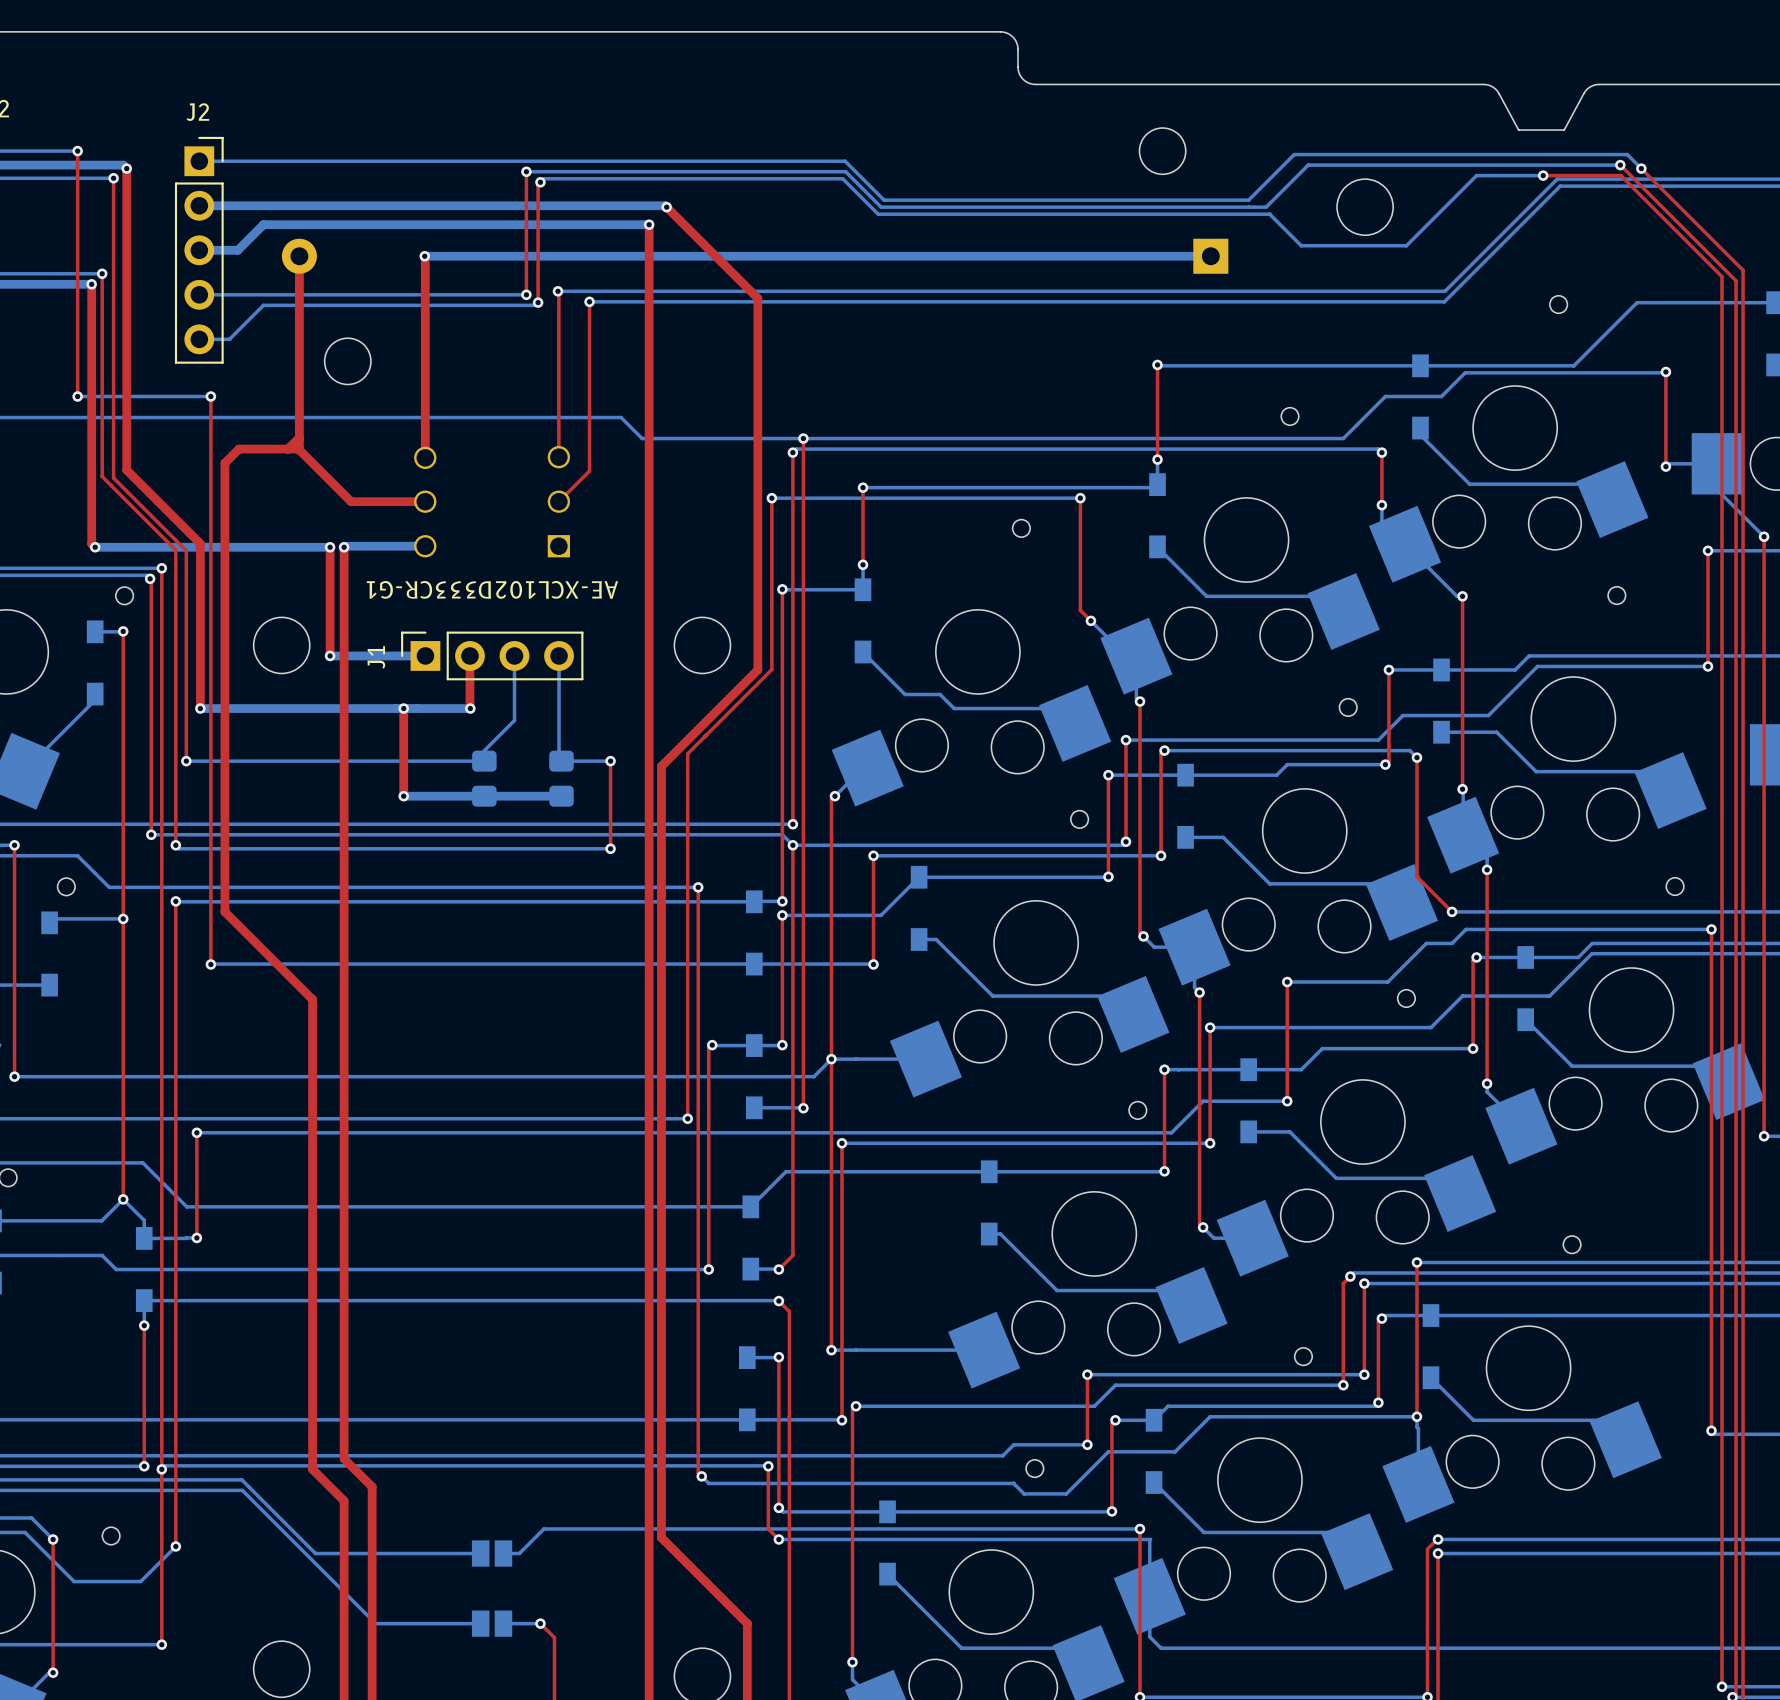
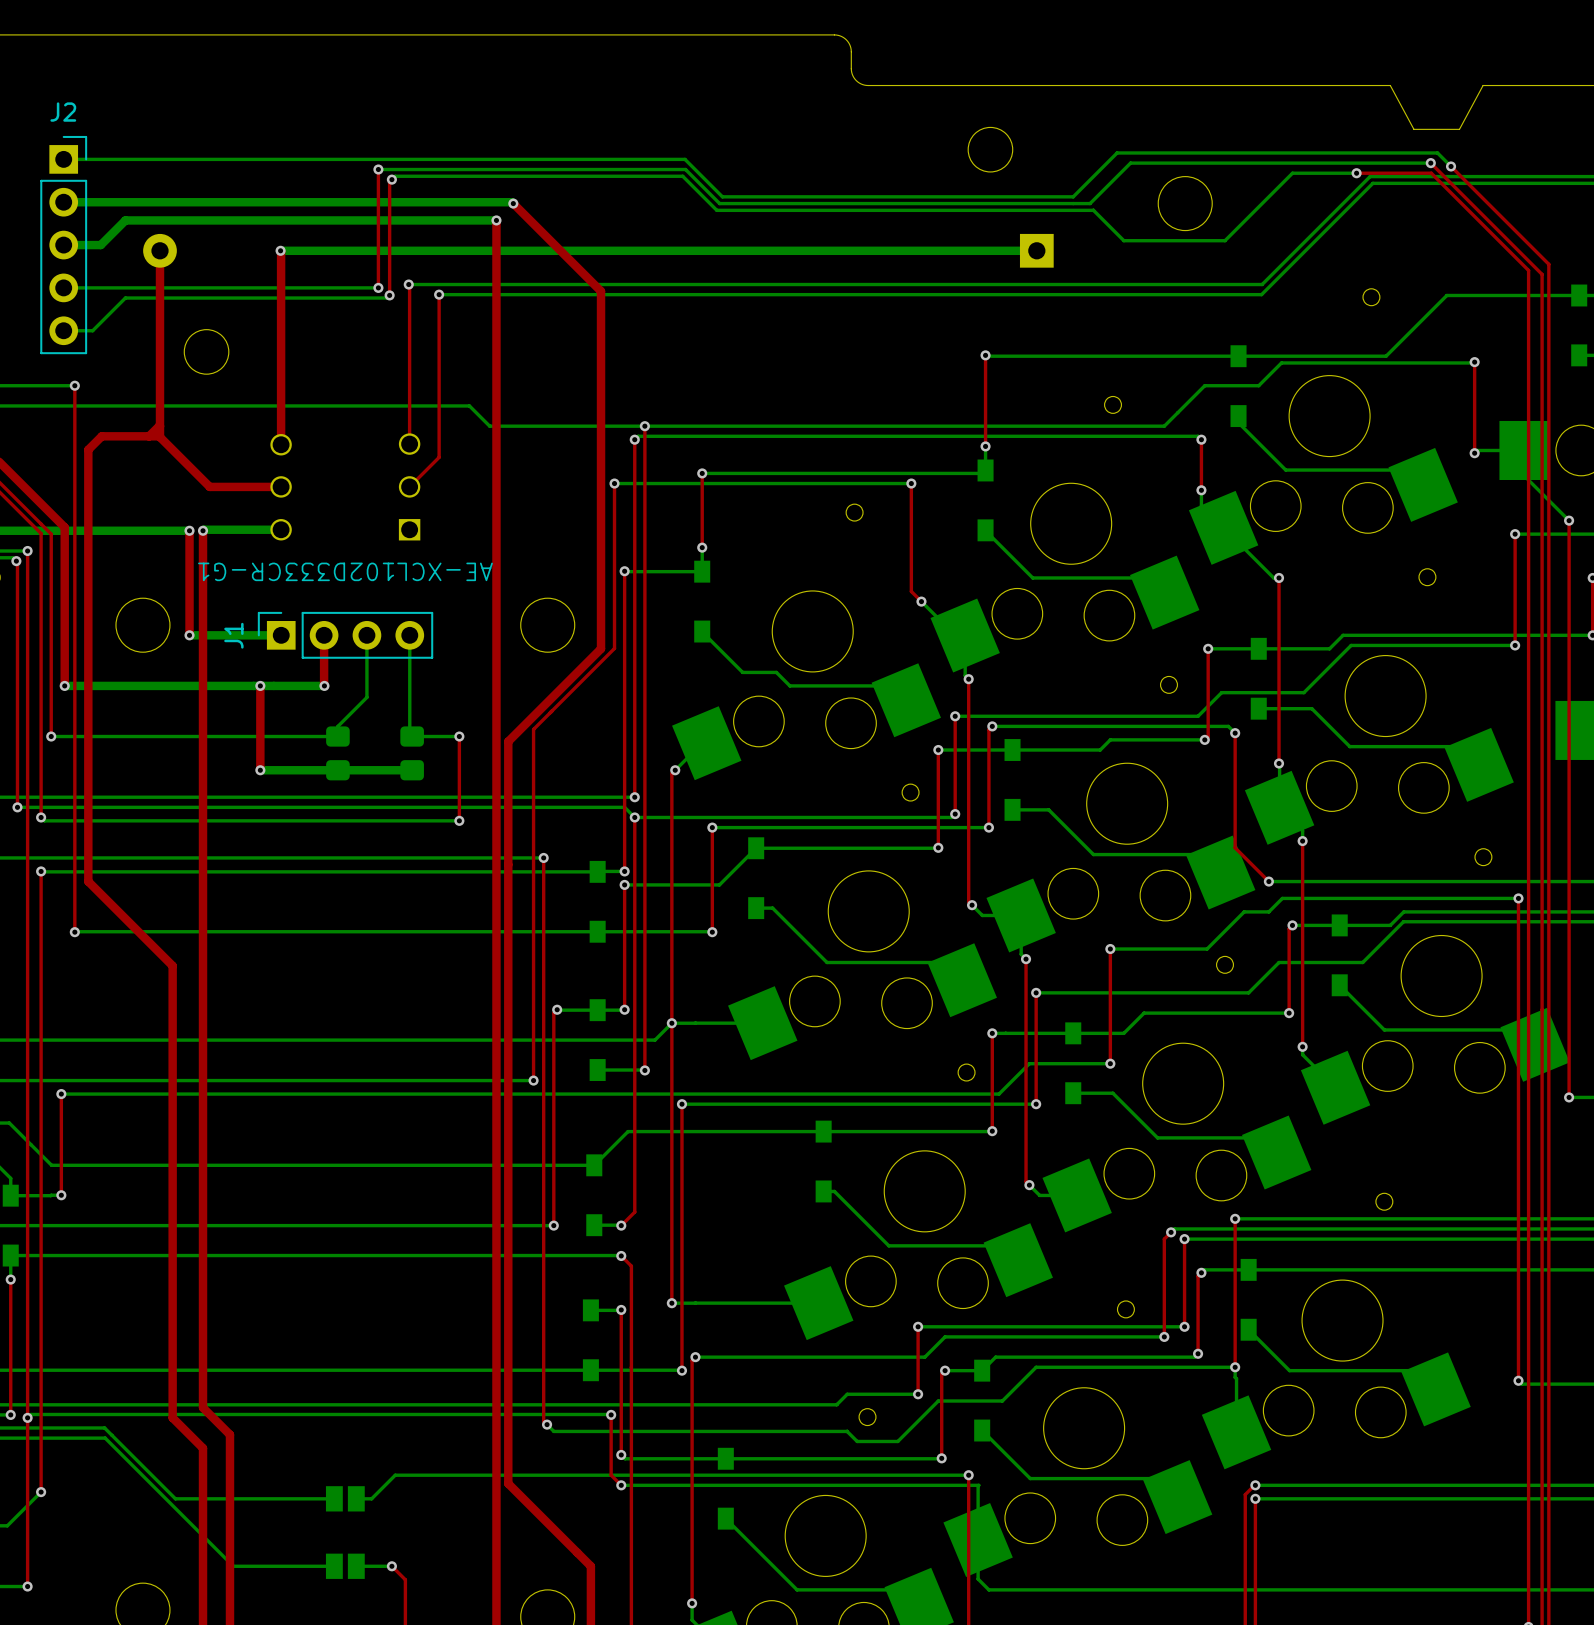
board edge: (1483, 84) (1490, 86) (1498, 92) (1518, 130) (1564, 130) (1584, 92) (1593, 85) (1674, 84) -> (1299, 85) (1390, 85) (1413, 129) (1459, 129) (1483, 85)

